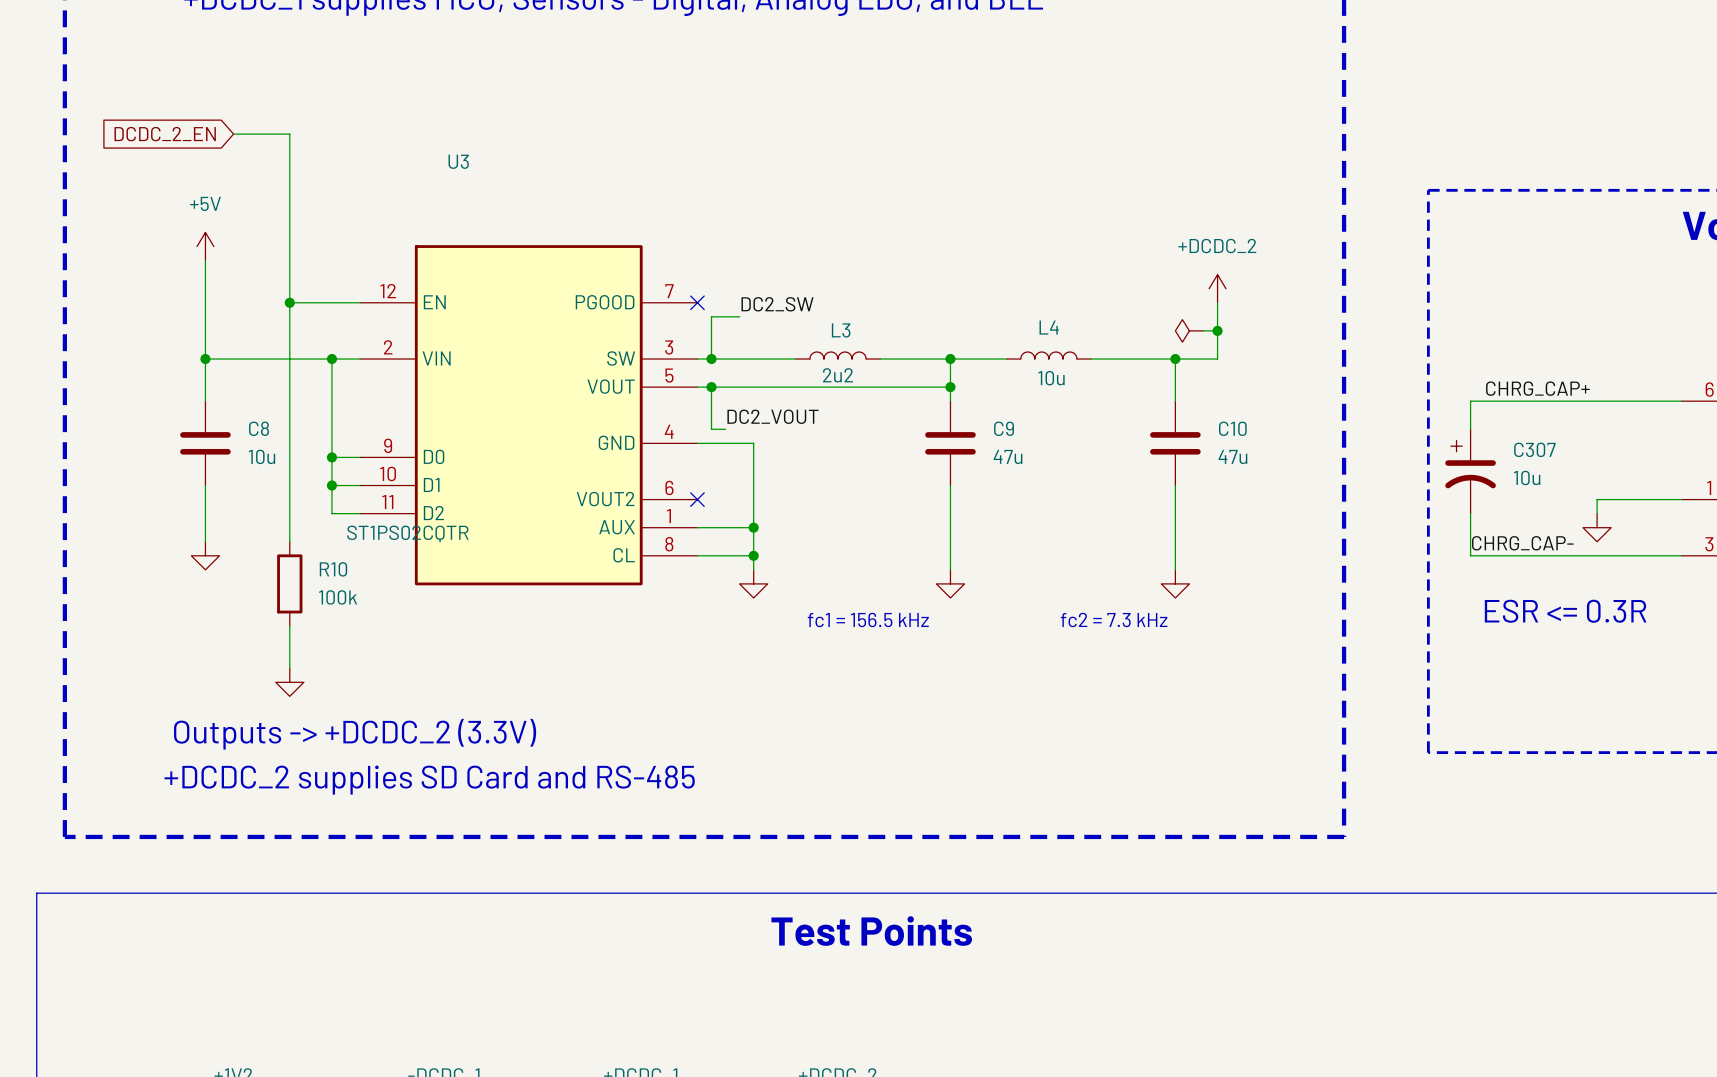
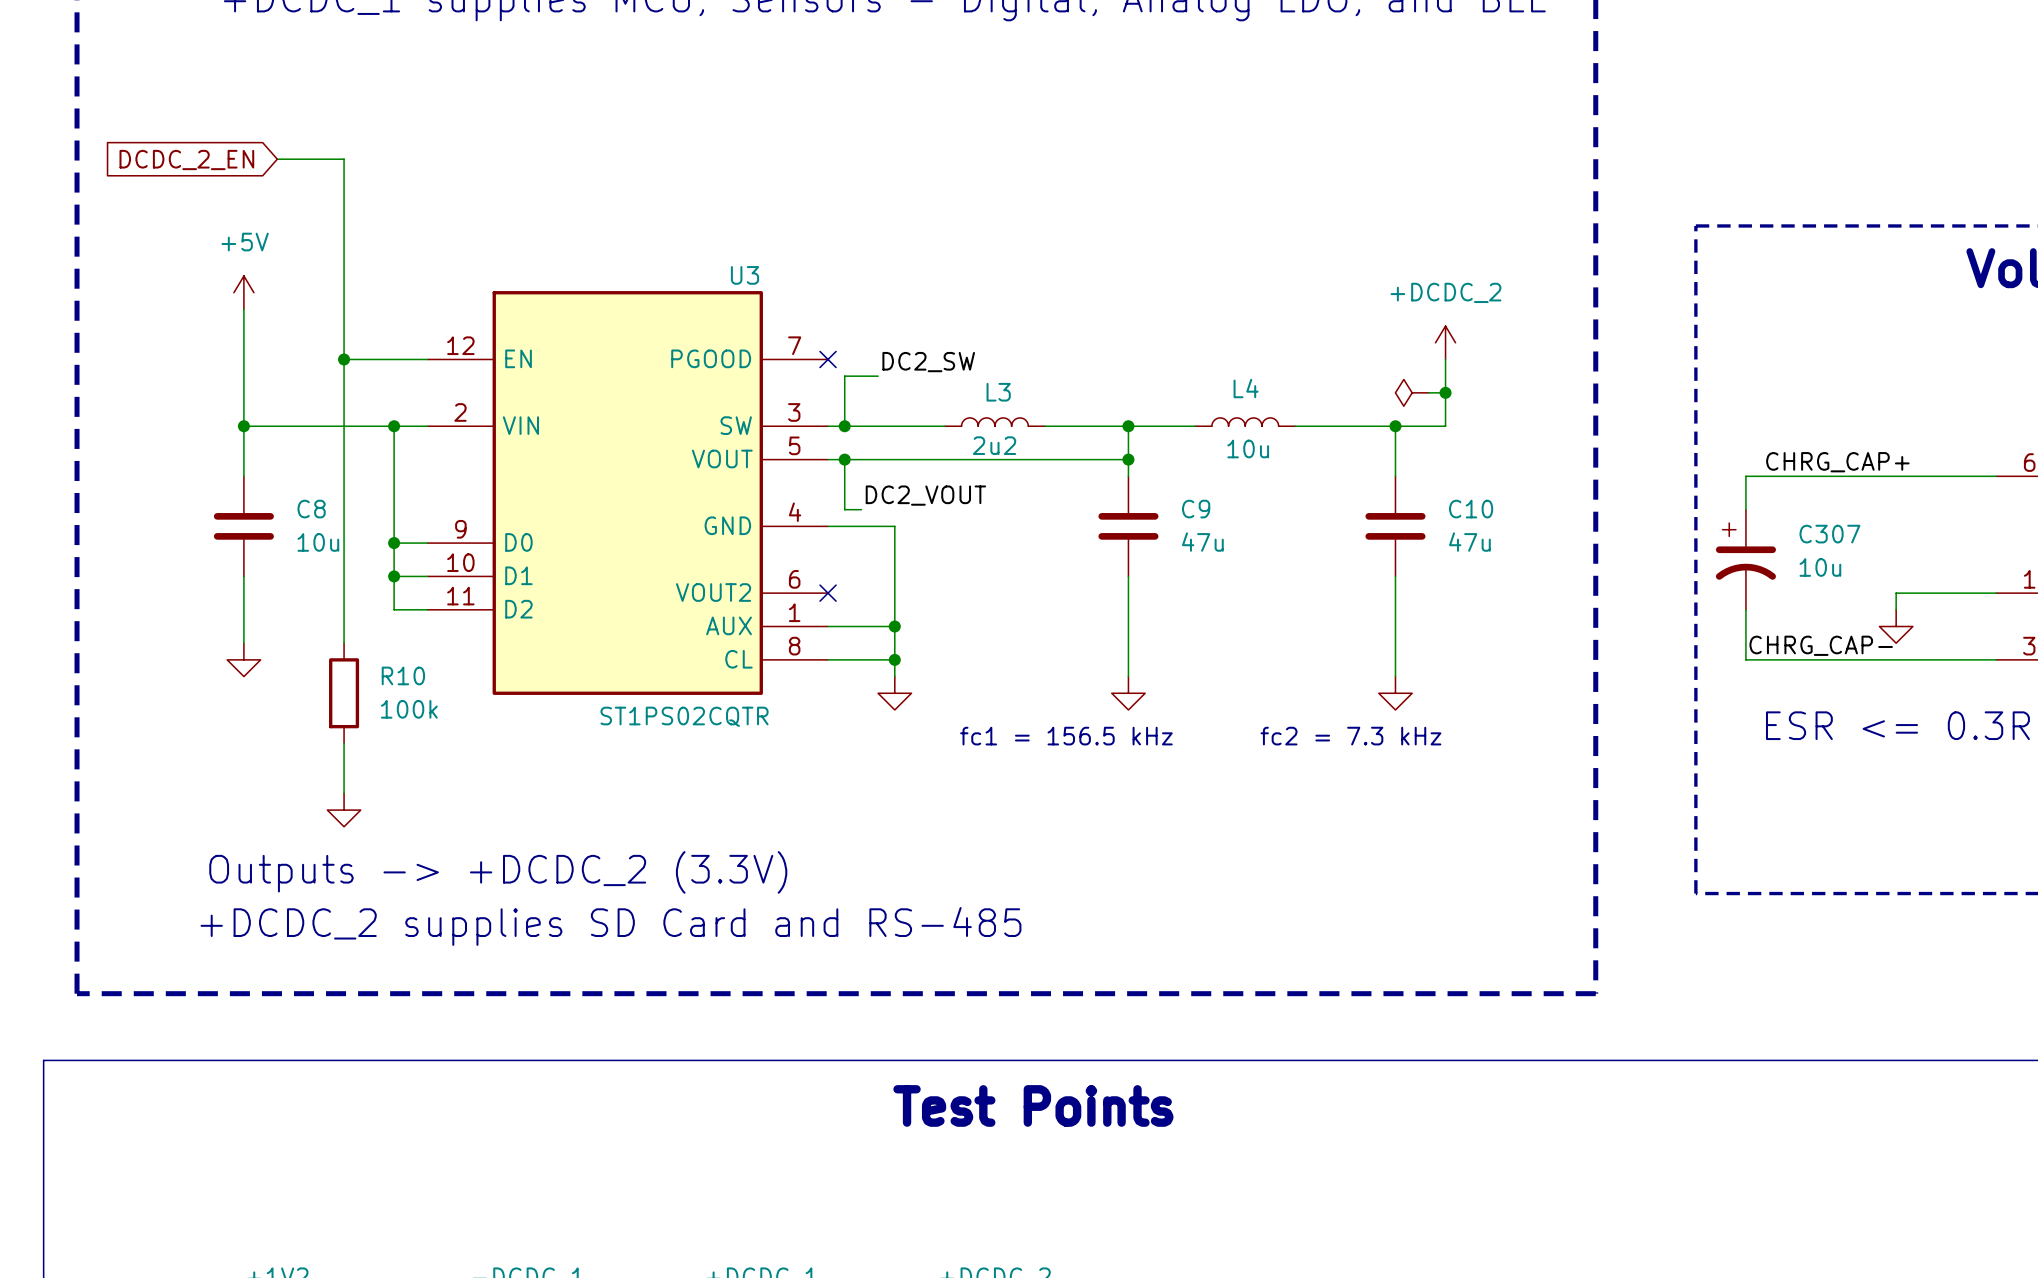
U3 name position: U3 (458, 161) -> U3 (744, 275)
U3 value position: ST1PS02CQTR (407, 533) -> ST1PS02CQTR (684, 716)

